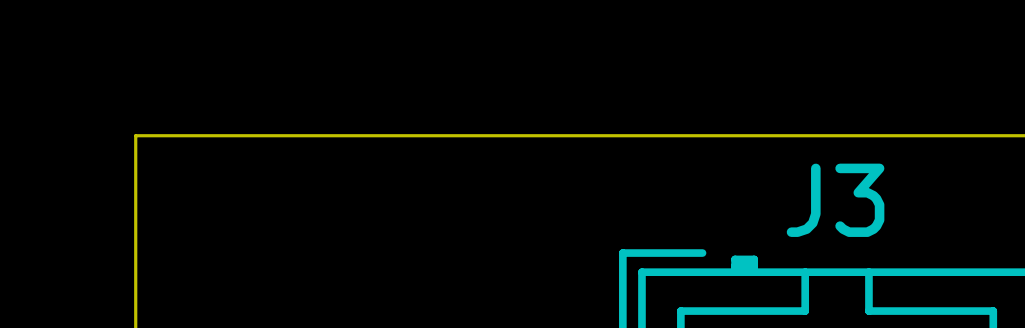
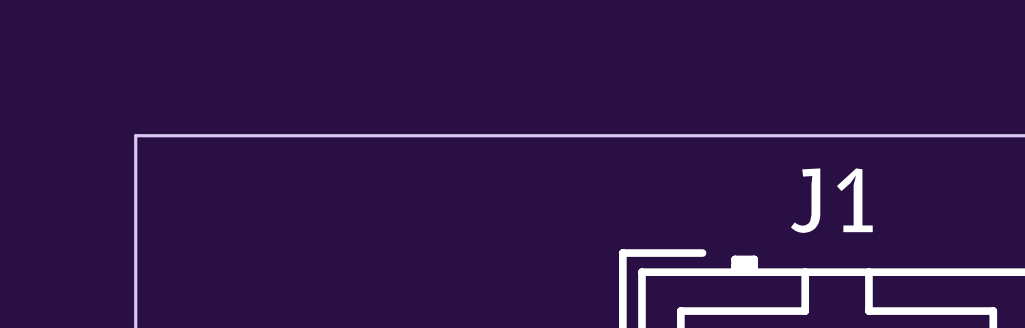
J3 name: J3 (835, 200) -> J1 (831, 200)

